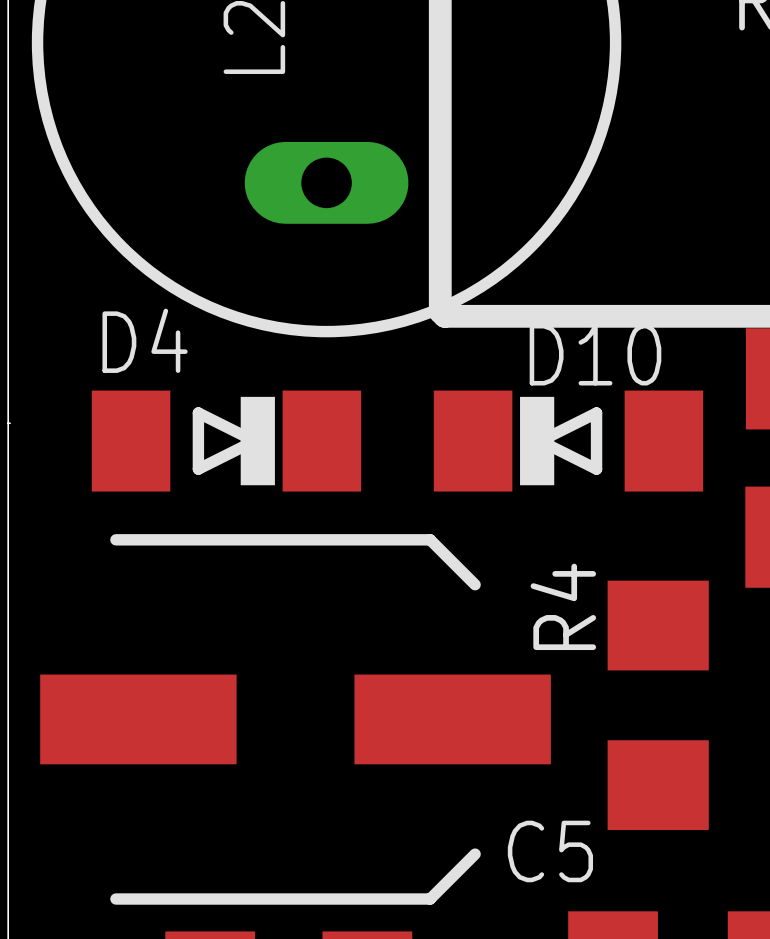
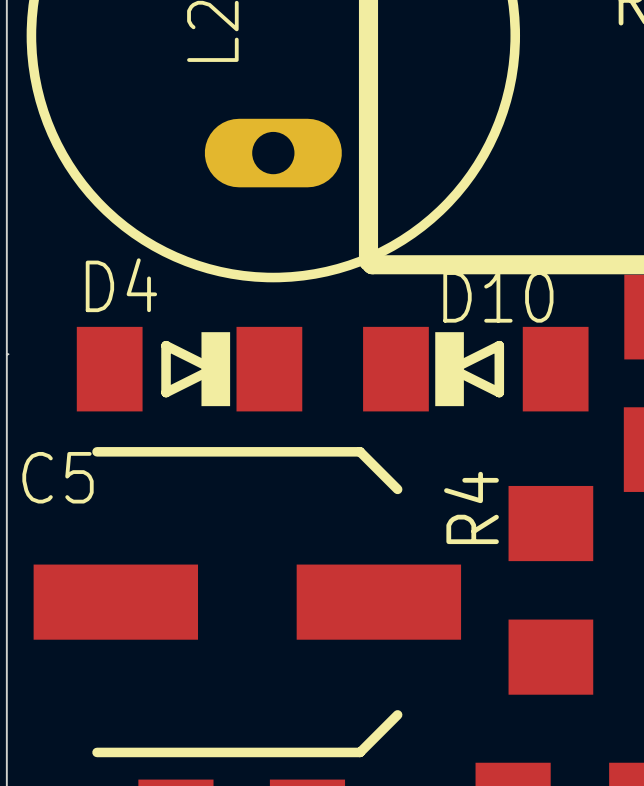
C5 name position: C5 (550, 851) -> C5 (58, 477)

